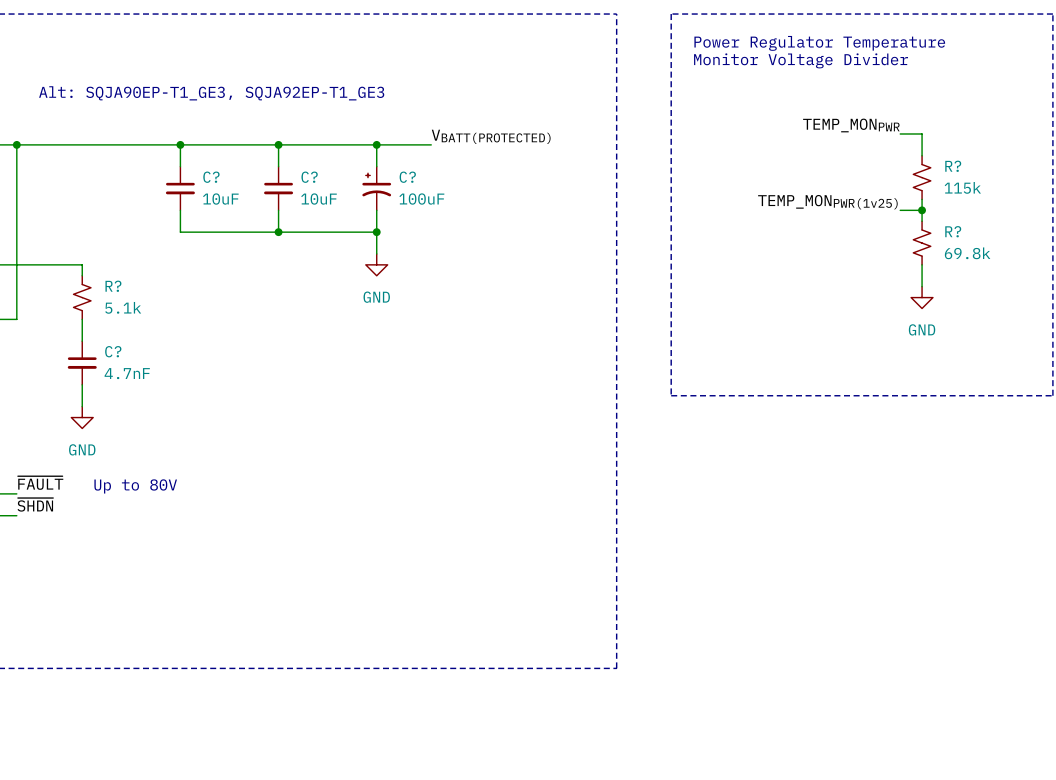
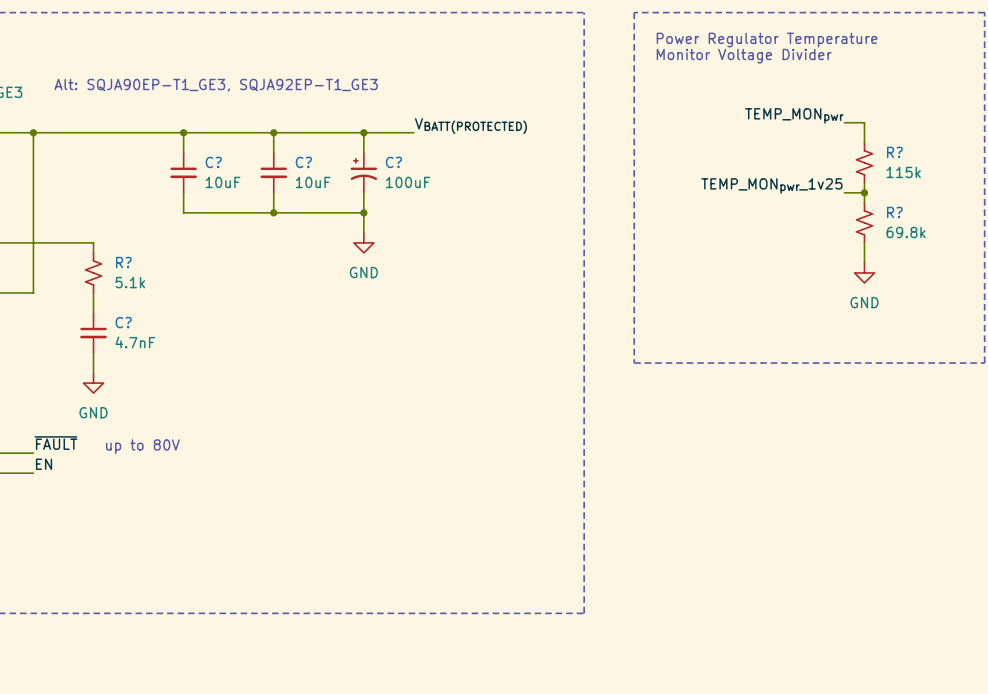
label: TEMP_MONPWR (851, 125) -> TEMP_MONpwr (794, 115)
label: TEMP_MONPWR(1v25) (827, 202) -> TEMP_MONpwr_1v25 (771, 185)
text: Up to 80V (135, 486) -> up to 80V (142, 446)
label: ~{SHDN} (35, 504) -> EN (44, 464)

